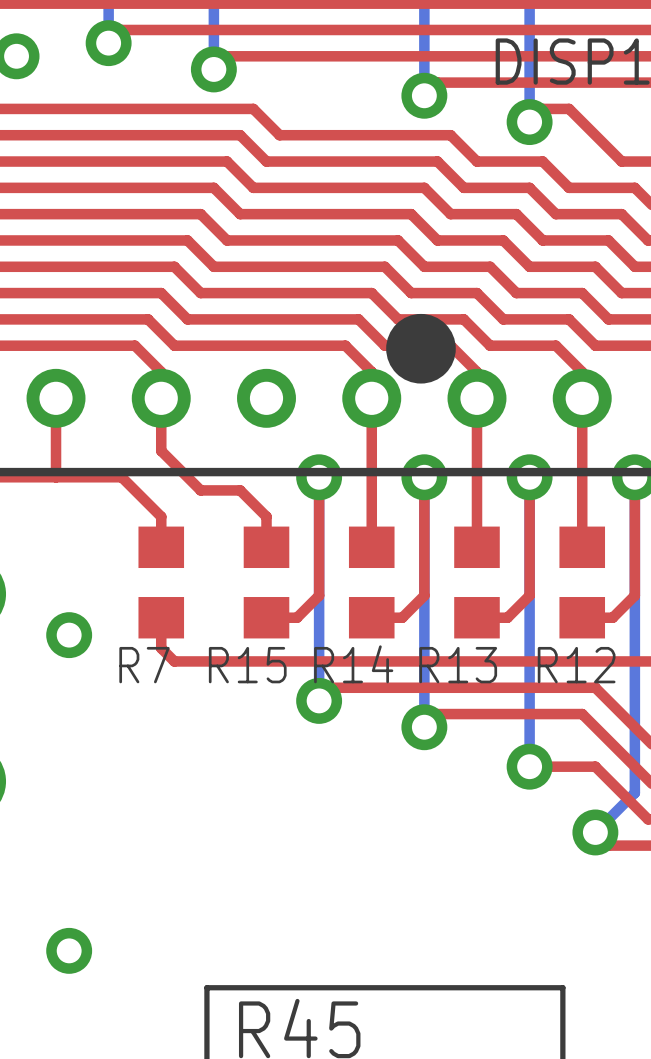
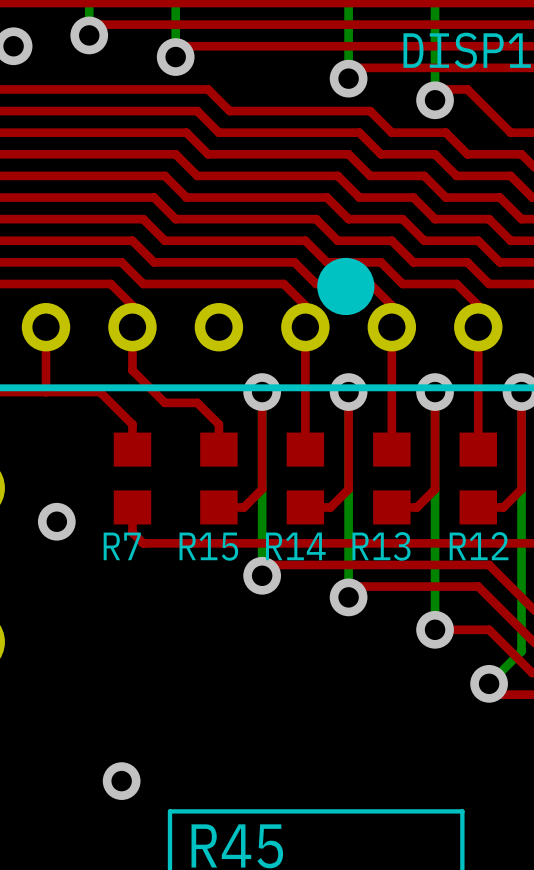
via position: (69, 950) -> (121, 781)

